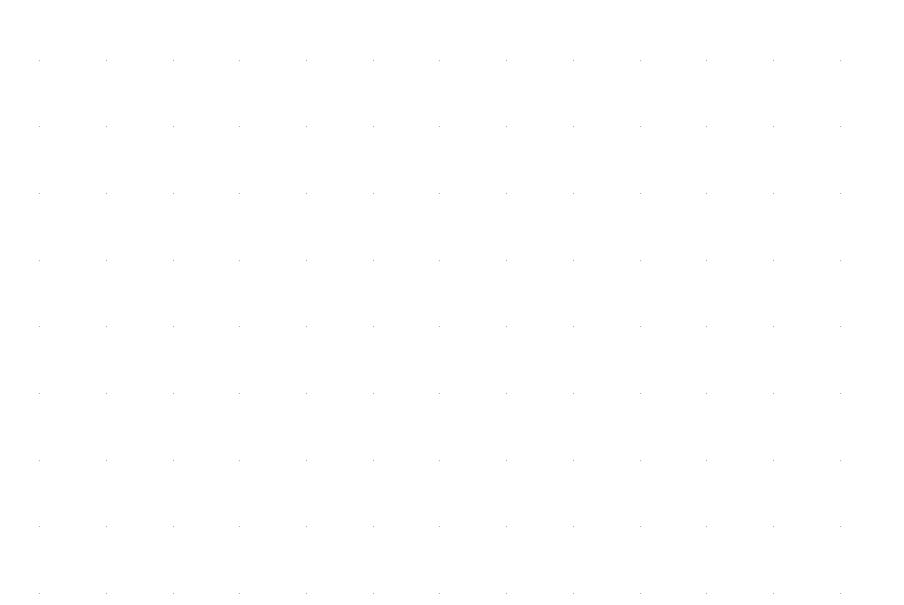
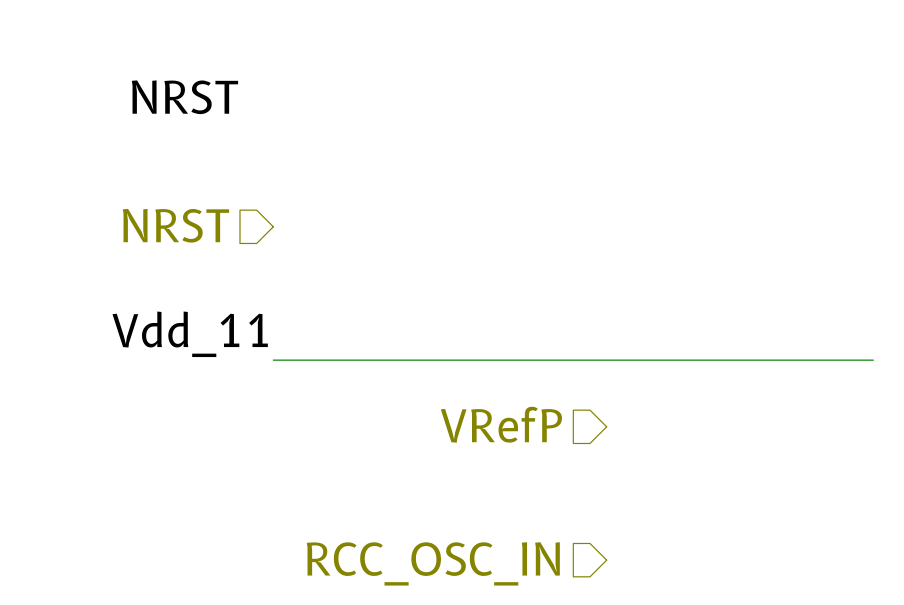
label: none -> NRST (184, 97)
hierarchical label: none -> NRST (175, 225)
label: none -> Vdd_11 (190, 334)
wire: none -> (273, 360) (873, 360)
hierarchical label: none -> VRefP (501, 424)
hierarchical label: none -> RCC_OSC_IN (433, 563)

